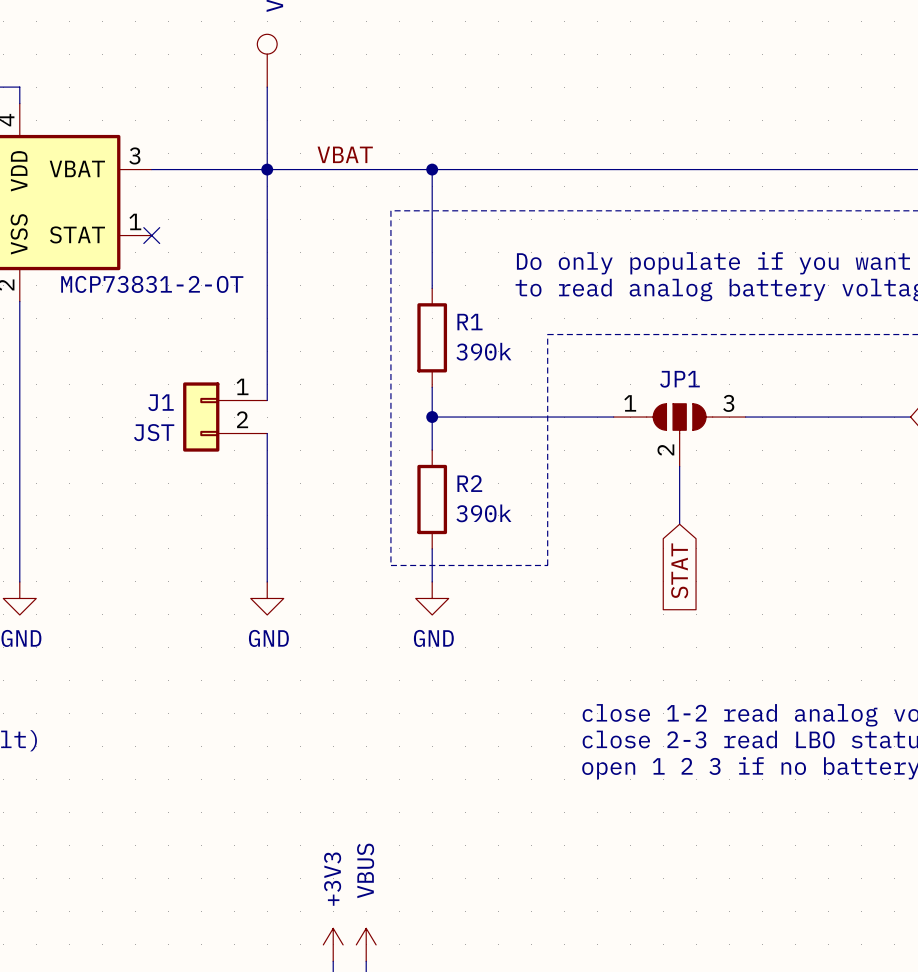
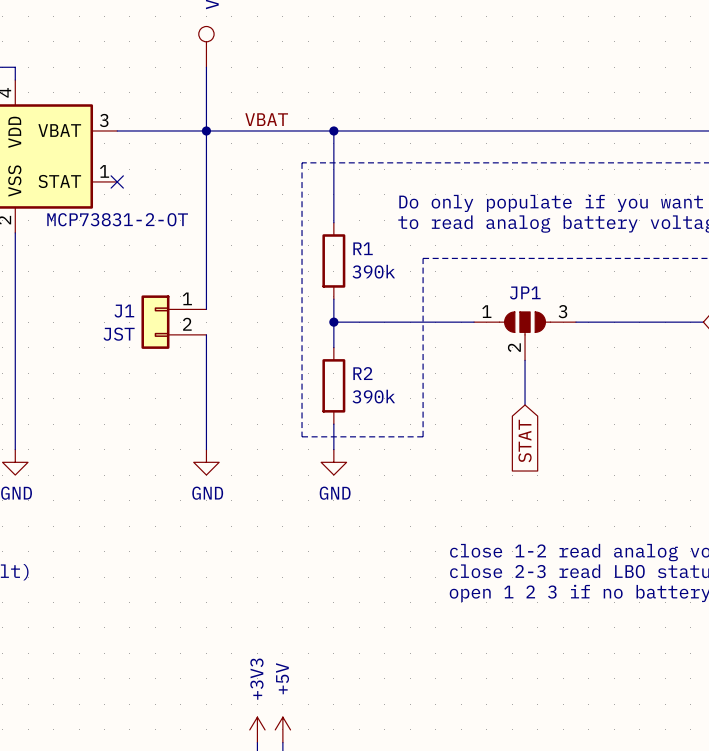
power symbol: VBUS (366, 944) -> +5V (282, 729)

